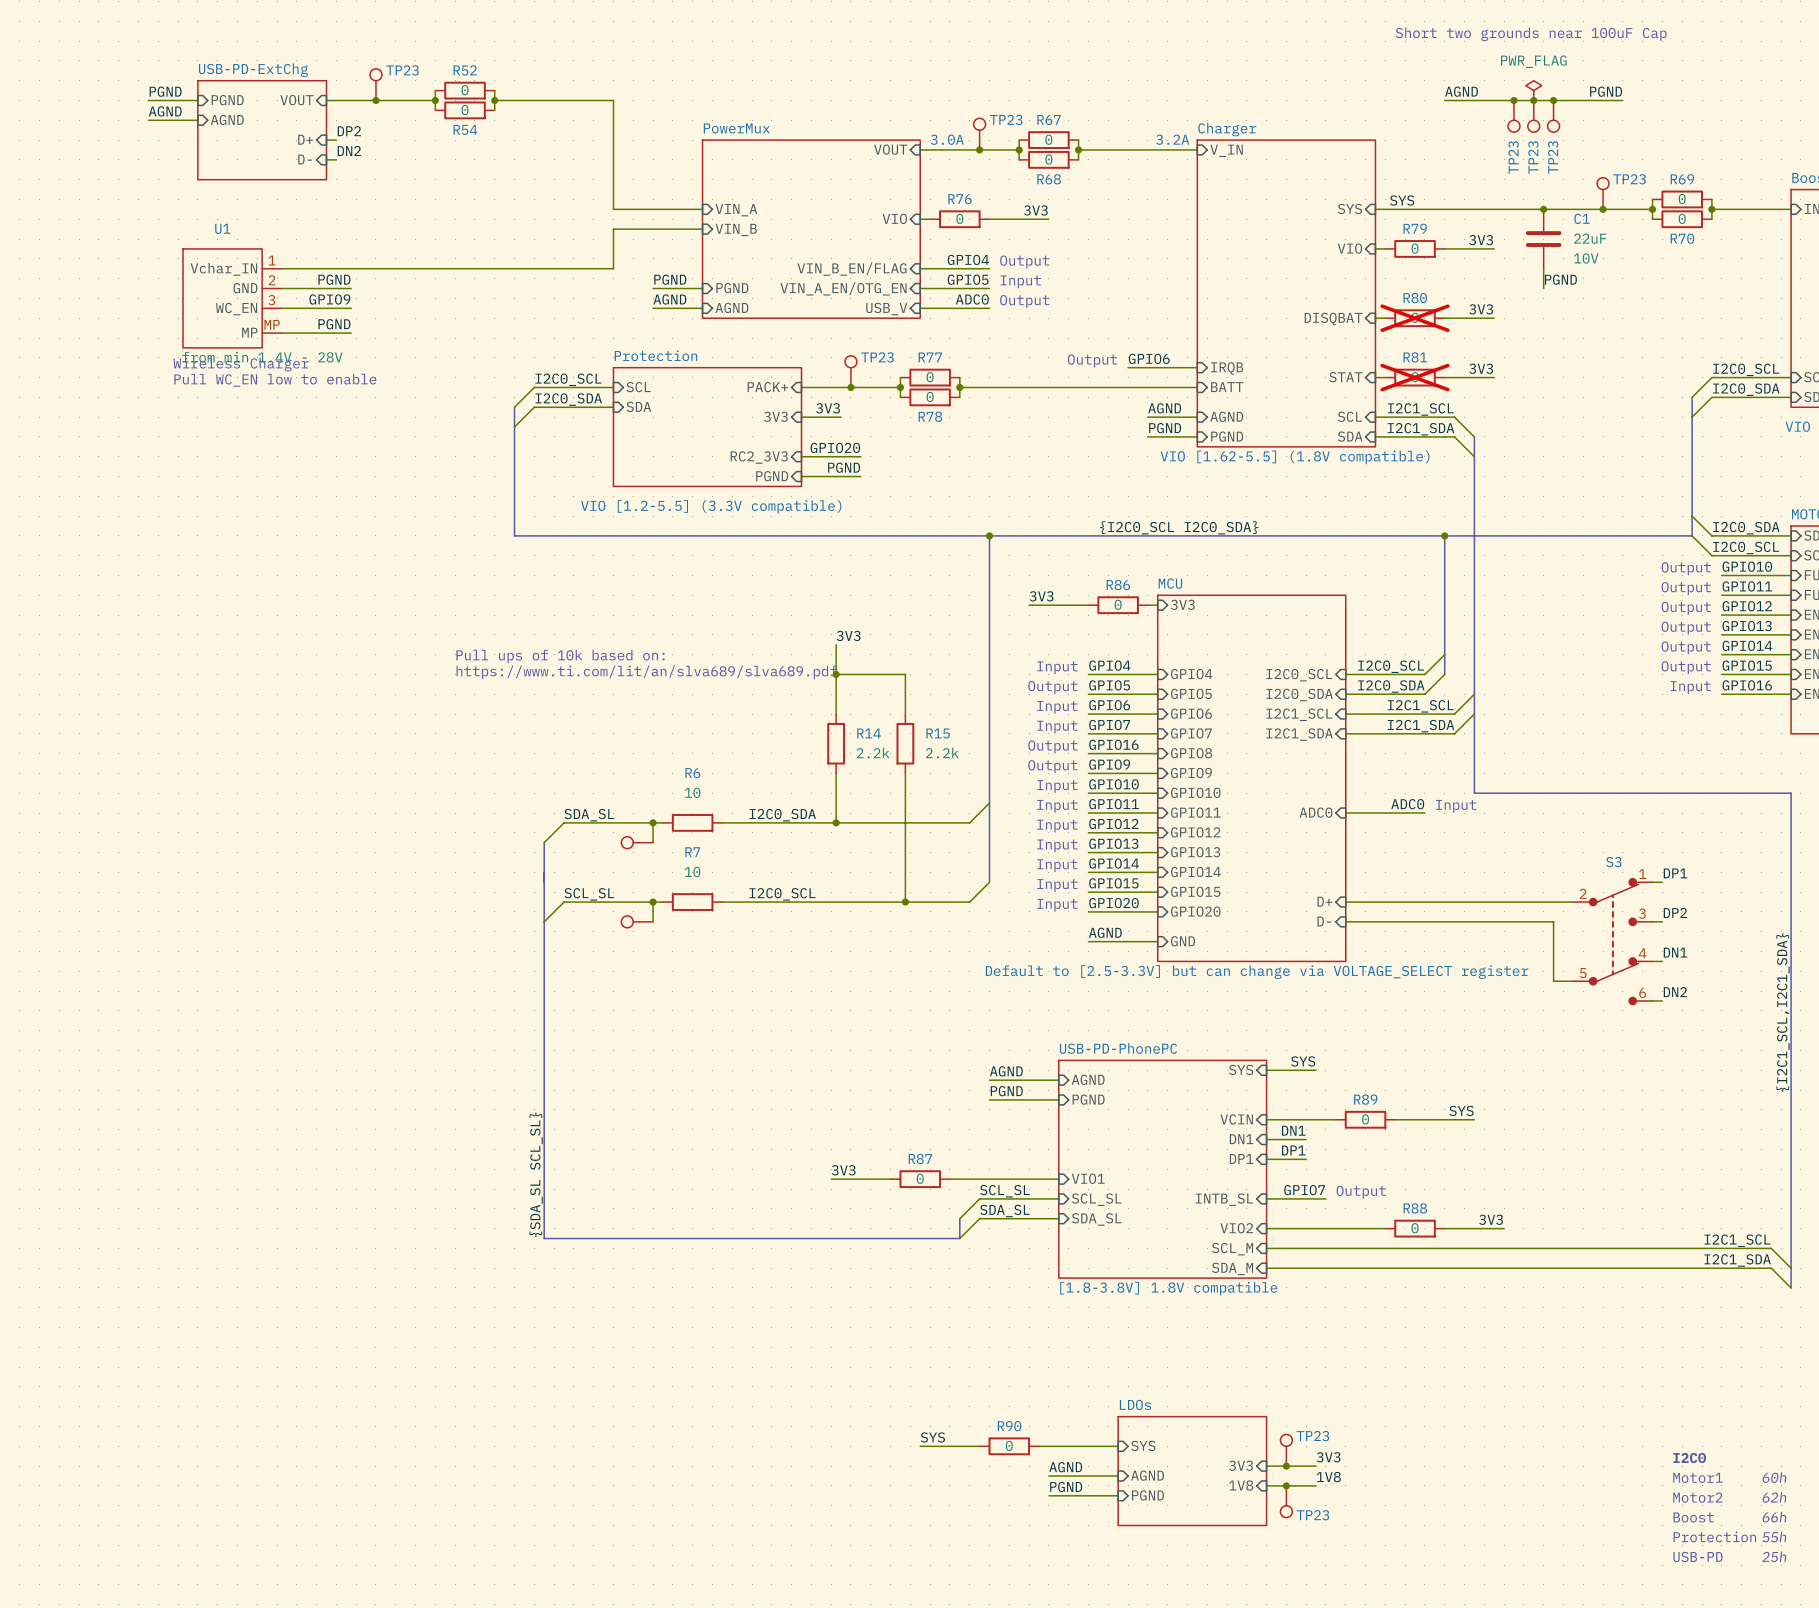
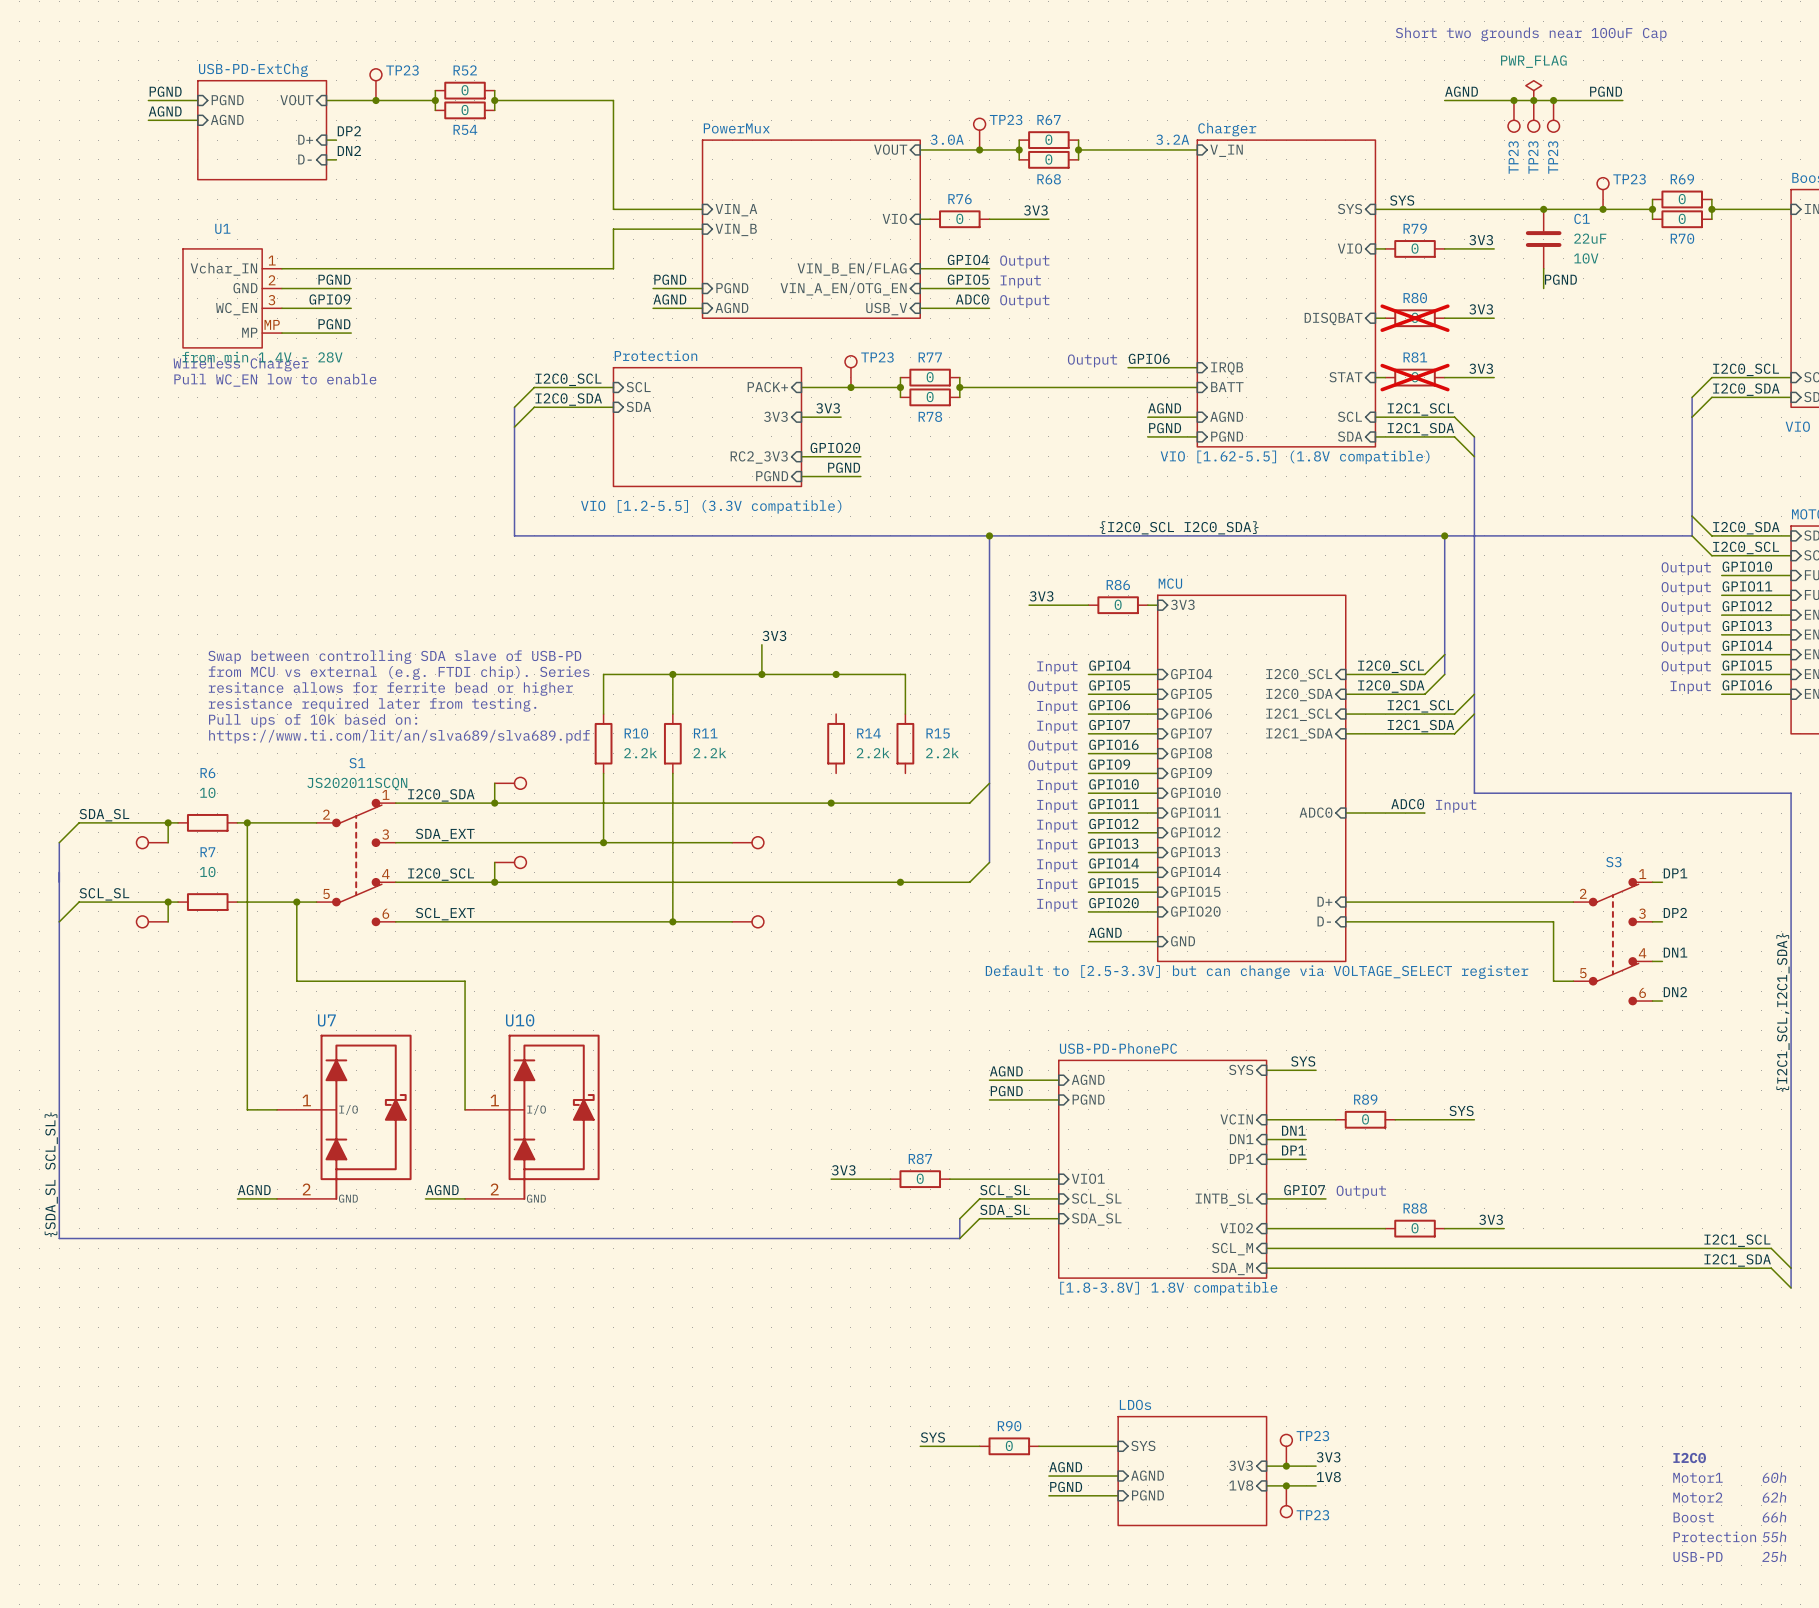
label position: 3V3 (848, 635) -> 3V3 (774, 635)
wire: none -> (761, 644) (761, 674)
wire: (836, 644) (836, 714) -> none
text: Pull ups of 10k based on: (560, 656) -> none
text: none -> Swap between controlling SDA slave of USB-PD (394, 657)
text: none -> from MCU vs external (e.g. FTDI chip). Series (399, 672)
text: https://www.ti.com/lit/an/slva689/slva689.pdf (646, 672) -> none
wire: none -> (672, 674) (672, 714)
junction: none -> (672, 674)
junction: none -> (761, 674)
wire: none -> (836, 674) (603, 674) (603, 714)
text: none -> resitance allows for ferrite bead or higher (390, 688)
text: none -> resistance required later from testing. (372, 704)
text: none -> Pull ups of 10k based on: (313, 720)
text: none -> https://www.ti.com/lit/an/slva689/slva689.pdf (399, 736)
R10: none -> 2.2k (603, 743)
R11: none -> 2.2k (672, 743)
wire: none -> (603, 773) (603, 842)
wire: none -> (672, 773) (672, 921)
wire: (836, 773) (836, 822) -> none
wire: (905, 773) (905, 902) -> none
part: none -> (510, 783)
wire: none -> (989, 783) (969, 803) (395, 803)
label: none -> I2C0_SDA (441, 795)
junction: none -> (494, 803)
wire: (989, 803) (969, 822) (722, 822) -> none
label: none -> SDA_SL (104, 815)
label: SDA_SL (589, 815) -> none
label: I2C0_SDA (782, 815) -> none
wire: none -> (168, 822) (168, 842)
junction: none -> (168, 822)
wire: none -> (178, 822) (79, 822) (59, 842)
wire: none -> (237, 822) (316, 822)
wire: none -> (247, 822) (247, 1109) (277, 1109)
junction: none -> (247, 822)
wire: (653, 822) (653, 842) -> (494, 783) (494, 803)
junction: (653, 822) -> none
wire: (662, 822) (563, 822) (544, 842) -> none
R6 position: (692, 822) -> (207, 822)
junction position: (836, 822) -> (831, 803)
label: none -> SDA_EXT (445, 834)
part: none -> (152, 842)
wire: none -> (395, 842) (732, 842)
bus: (544, 842) (544, 1238) -> (59, 842) (59, 1238) (544, 1238)
junction: none -> (603, 842)
part: (637, 842) -> none
part: none -> (748, 842)
S1: none -> JS202011SCQN (356, 862)
part: none -> (510, 862)
wire: none -> (989, 862) (969, 882) (395, 882)
bus: (989, 862) (989, 882) -> none
label: none -> I2C0_SCL (441, 874)
junction: none -> (494, 882)
wire: (989, 882) (969, 902) (722, 902) -> none
label: none -> SCL_SL (104, 894)
label: SCL_SL (589, 894) -> none
label: I2C0_SCL (782, 894) -> none
wire: none -> (168, 902) (168, 921)
junction: none -> (168, 902)
wire: none -> (178, 902) (79, 902) (59, 921)
wire: none -> (237, 902) (316, 902)
wire: none -> (296, 902) (296, 981) (465, 981) (465, 1109)
junction: none -> (296, 902)
wire: (653, 902) (653, 921) -> (494, 862) (494, 882)
junction position: (653, 902) -> (672, 921)
wire: (662, 902) (563, 902) (544, 921) -> none
R7 position: (692, 902) -> (207, 902)
junction position: (905, 902) -> (900, 882)
label: none -> SCL_EXT (445, 914)
part: none -> (152, 921)
wire: none -> (395, 921) (732, 921)
part: (637, 921) -> none
part: none -> (748, 921)
U7: none -> (344, 1117)
U10: none -> (532, 1117)
label: none -> {SDA_SL SCL_SL} (51, 1174)
label: {SDA_SL SCL_SL} (536, 1174) -> none
label: none -> AGND (254, 1190)
label: none -> AGND (442, 1190)
wire: none -> (237, 1198) (277, 1198)
wire: none -> (425, 1198) (465, 1198)

